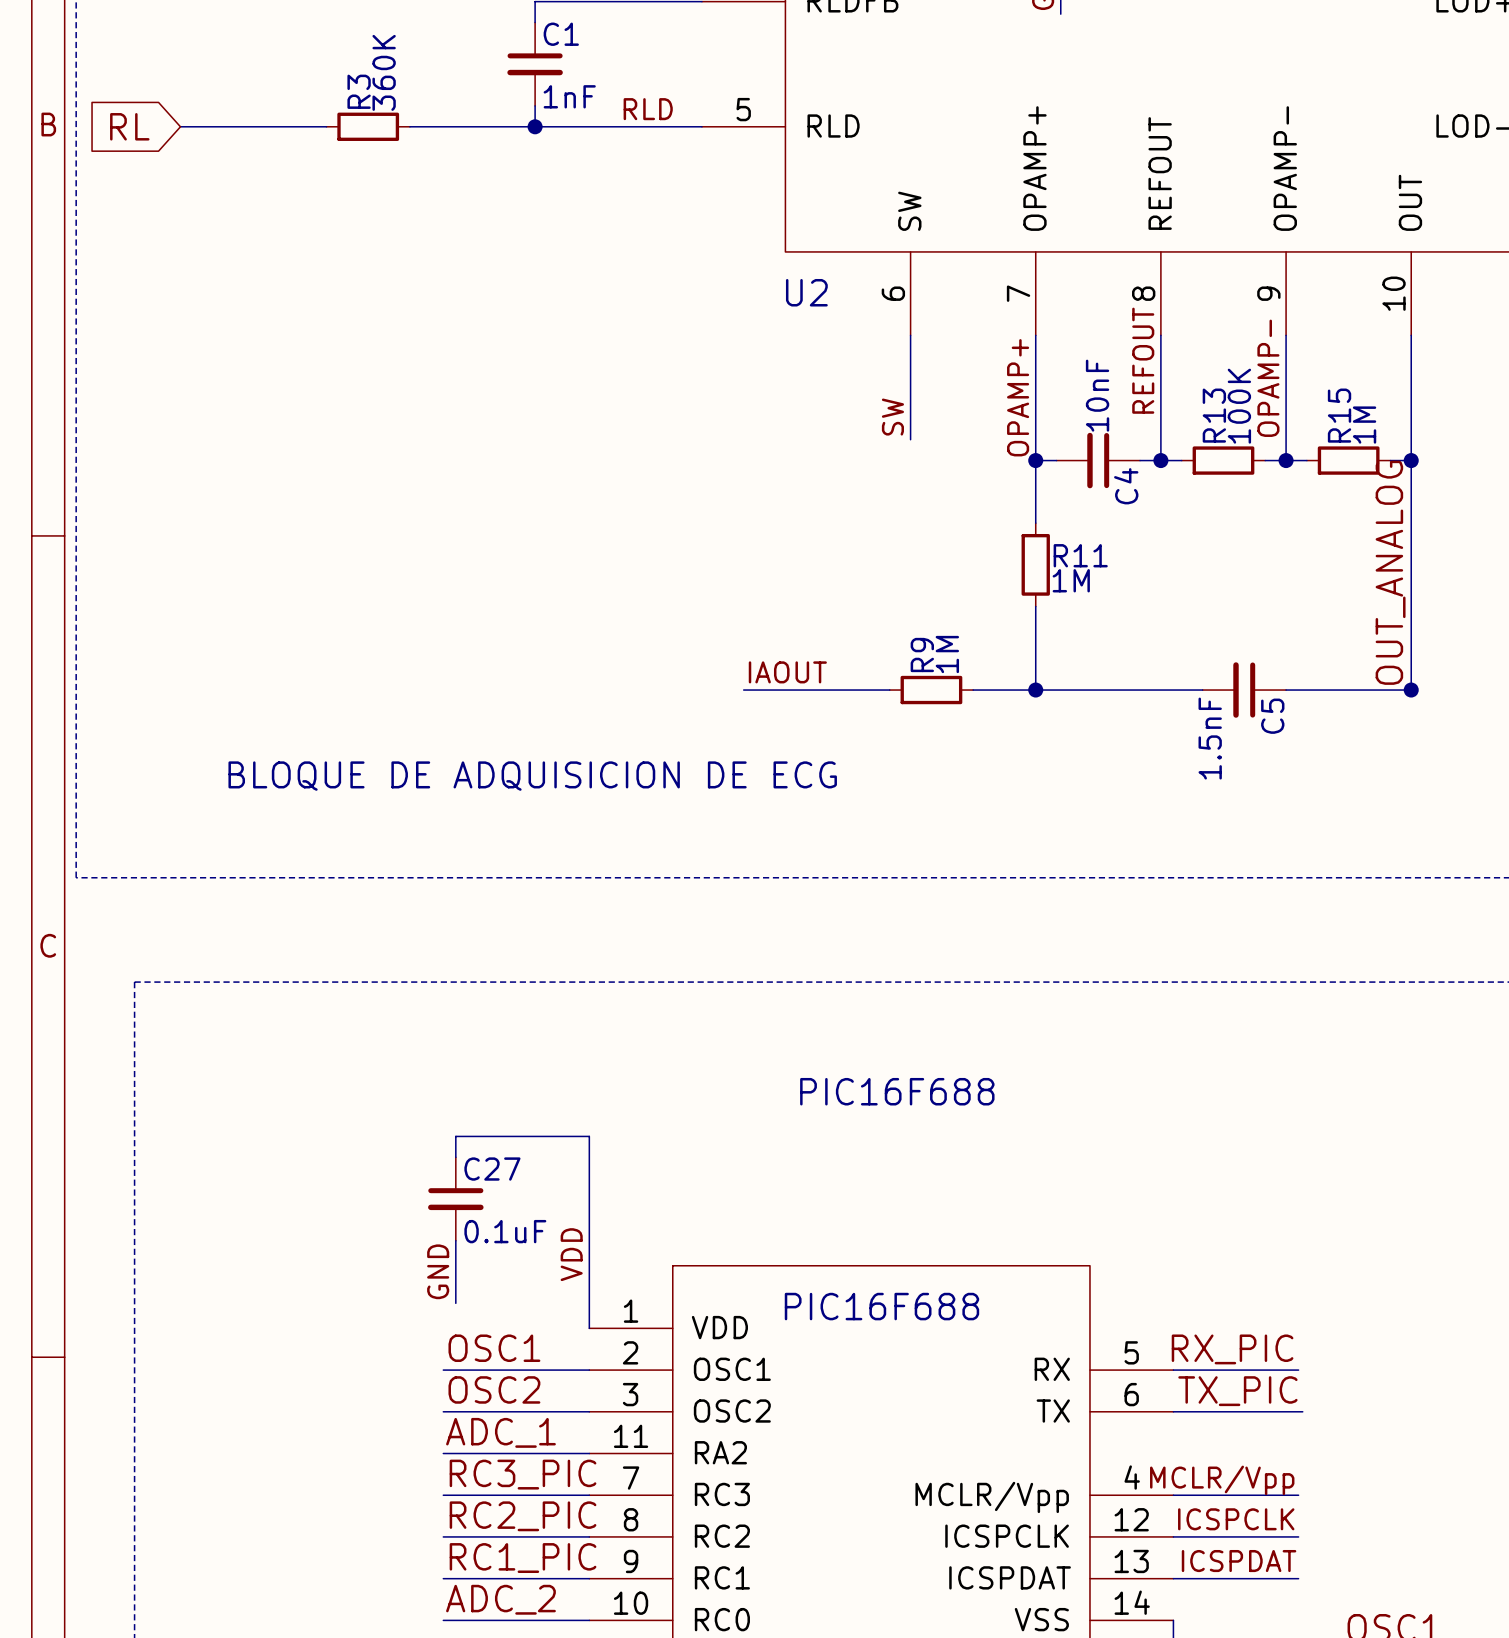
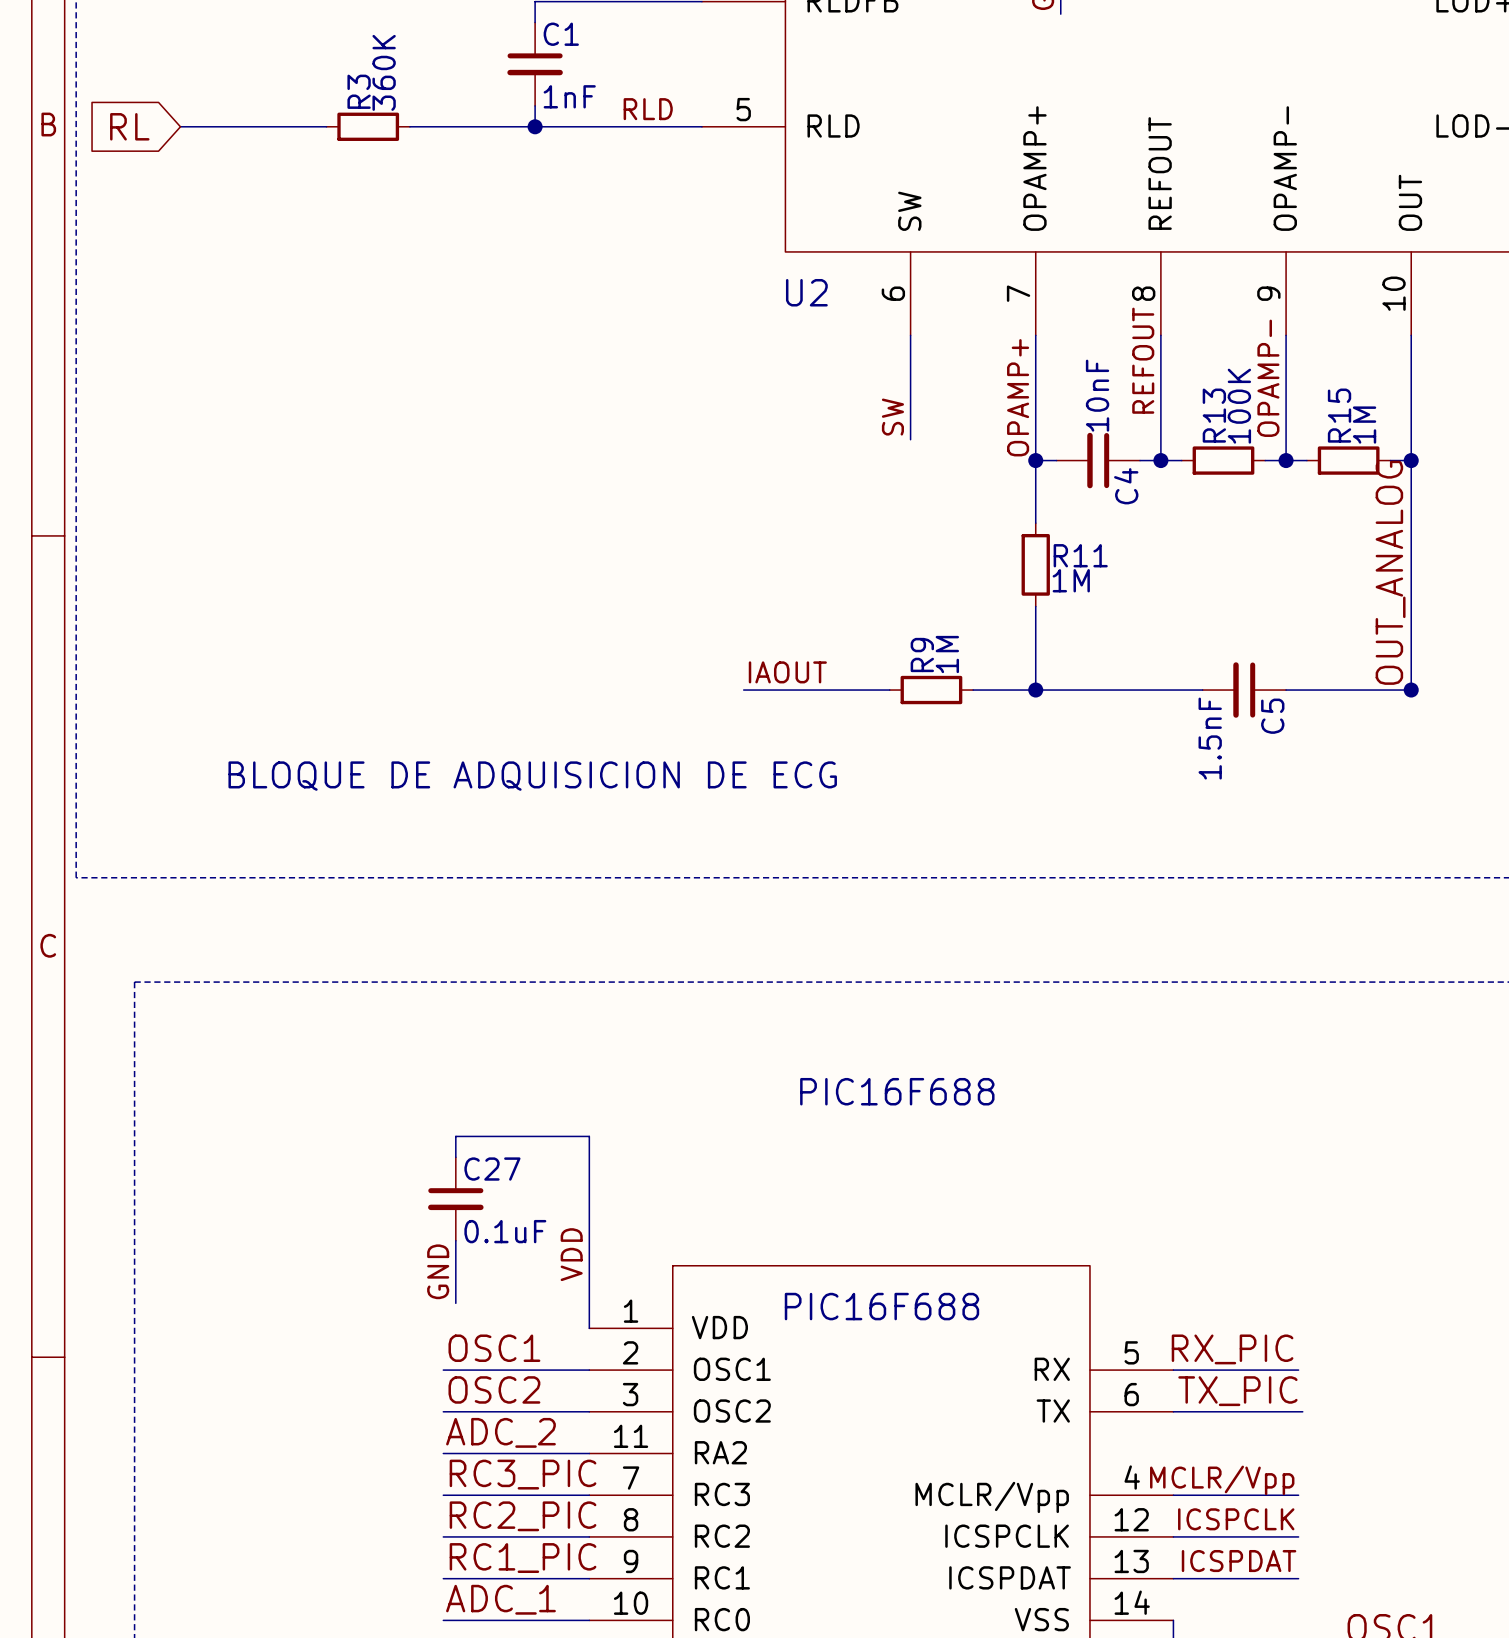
label: ADC_1 (500, 1432) -> ADC_2 (500, 1432)
label: ADC_2 (500, 1599) -> ADC_1 (500, 1599)

